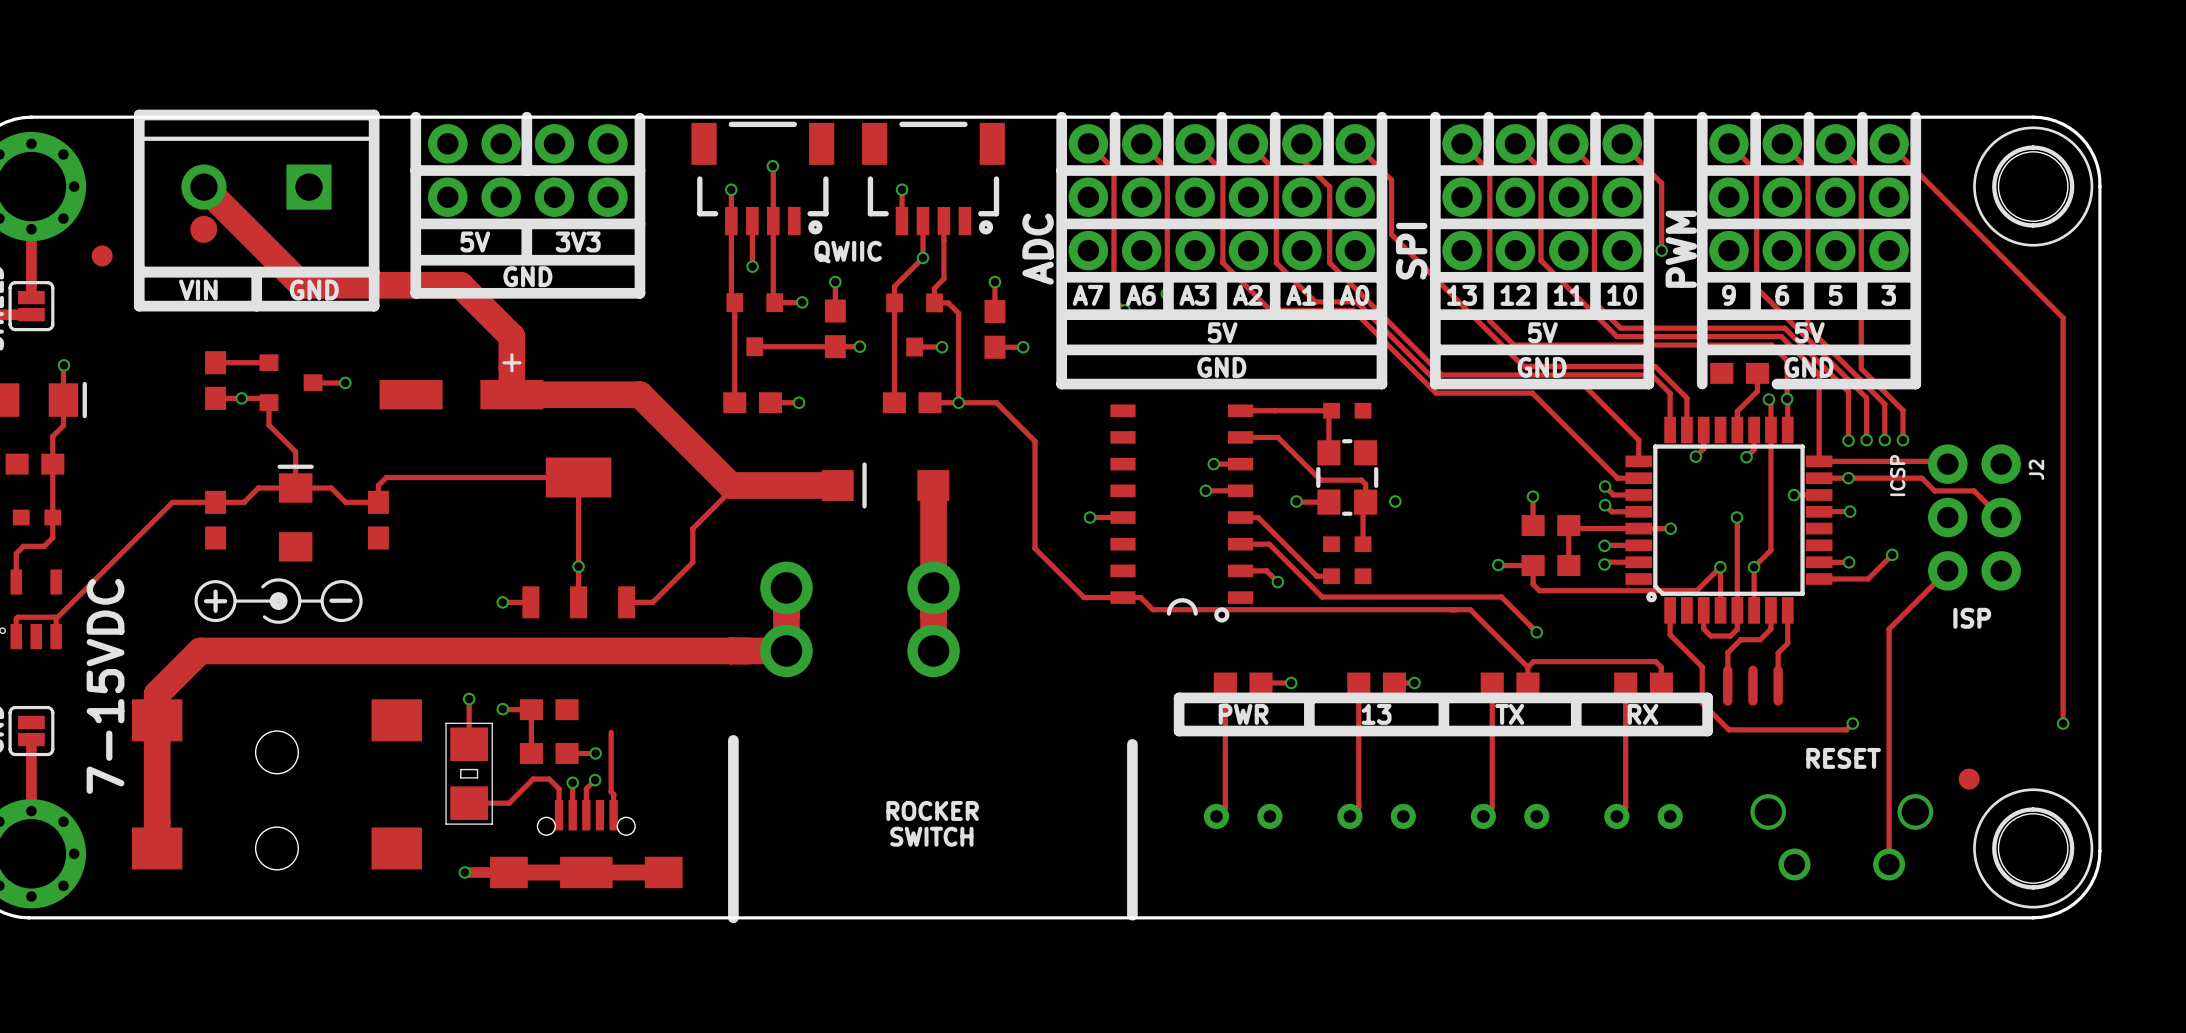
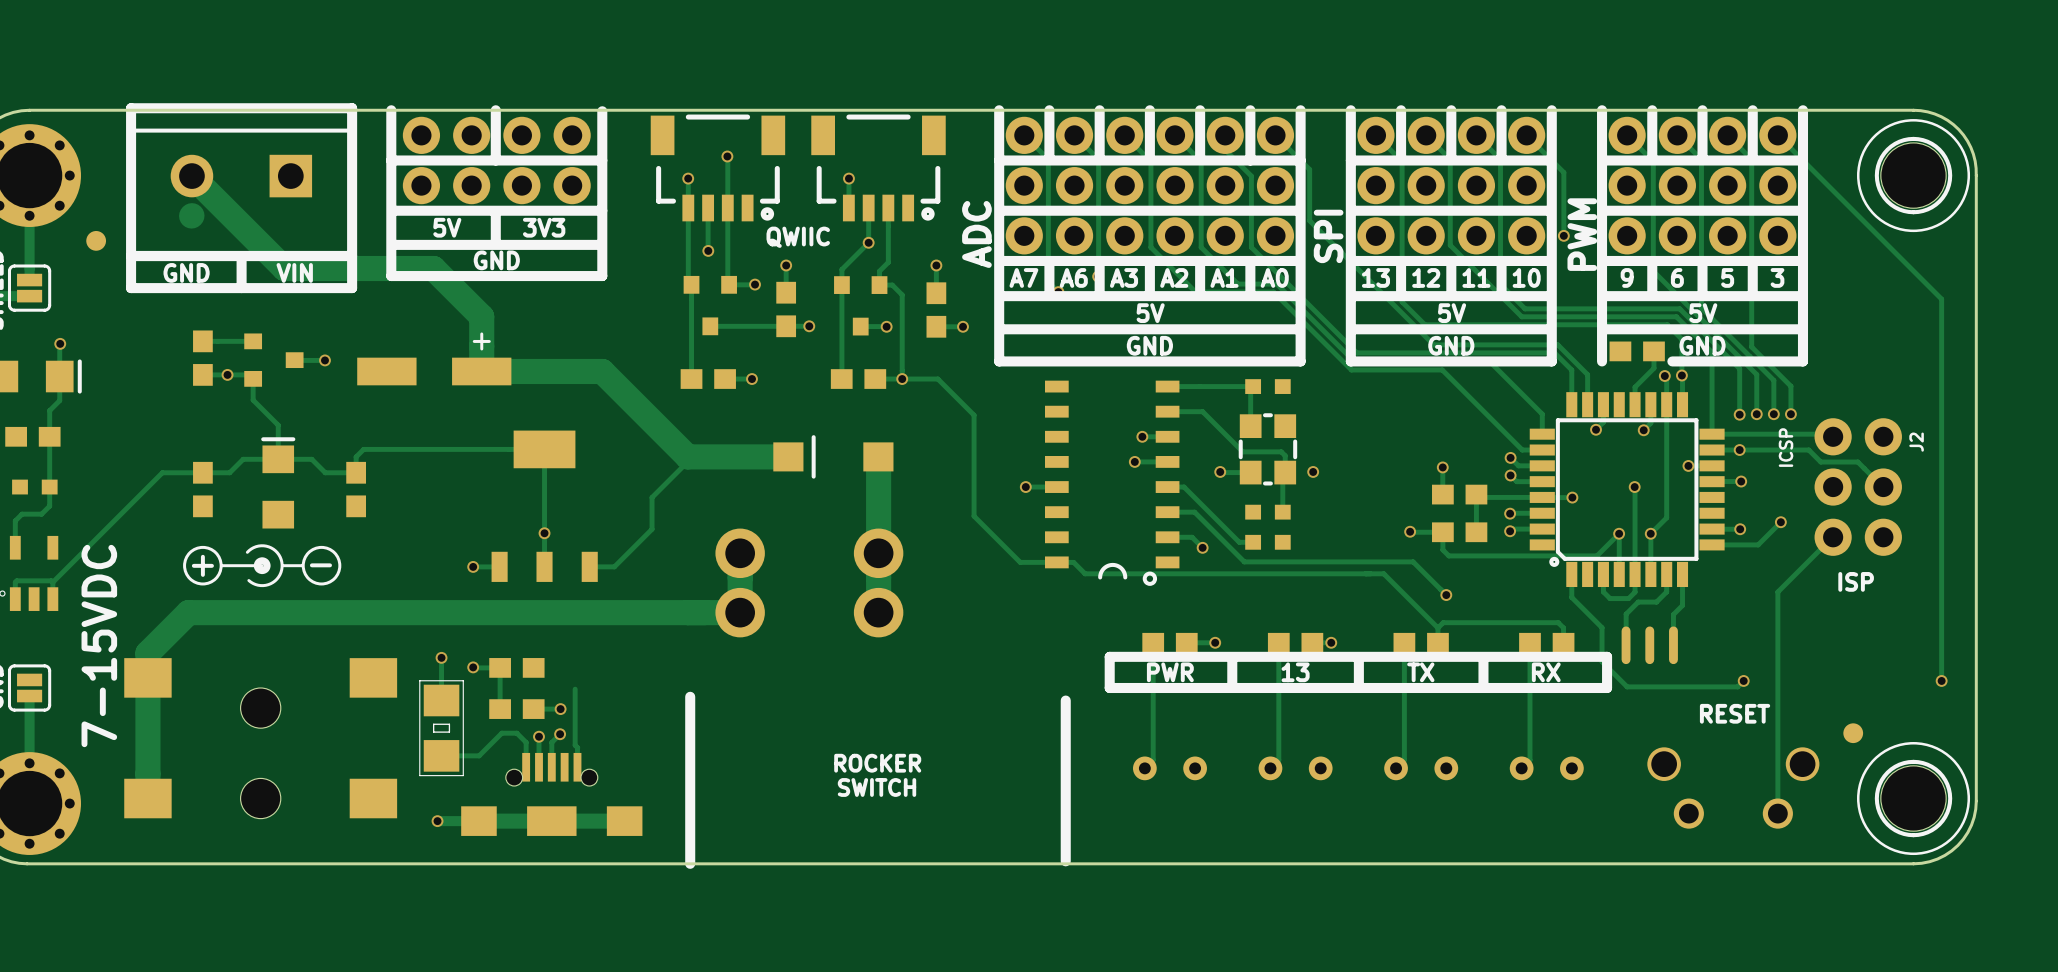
text: VIN (198, 290) -> GND (186, 272)
text: GND (314, 290) -> VIN (294, 272)

